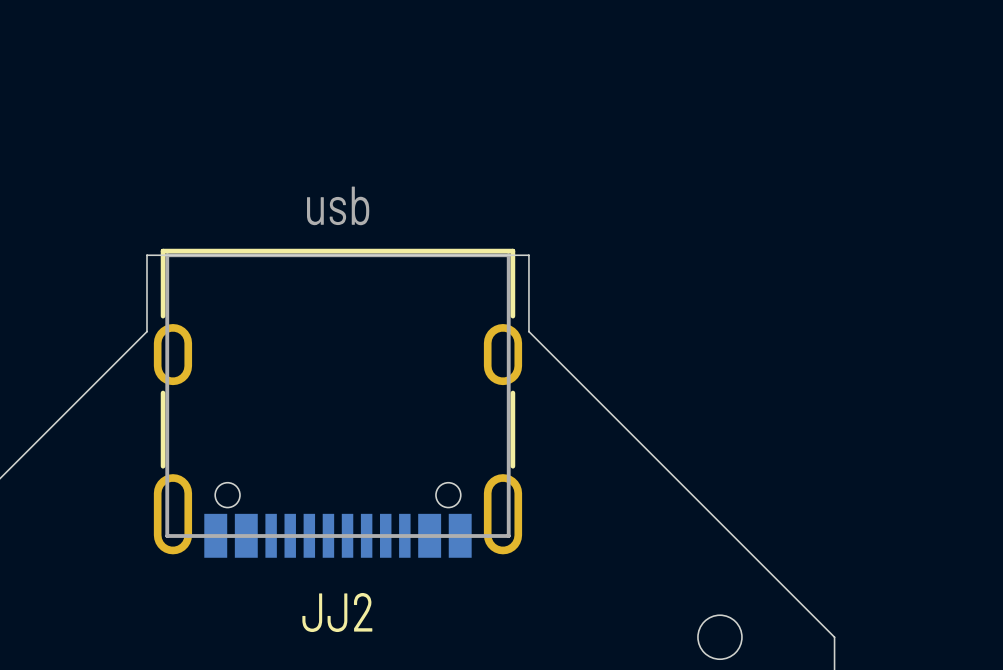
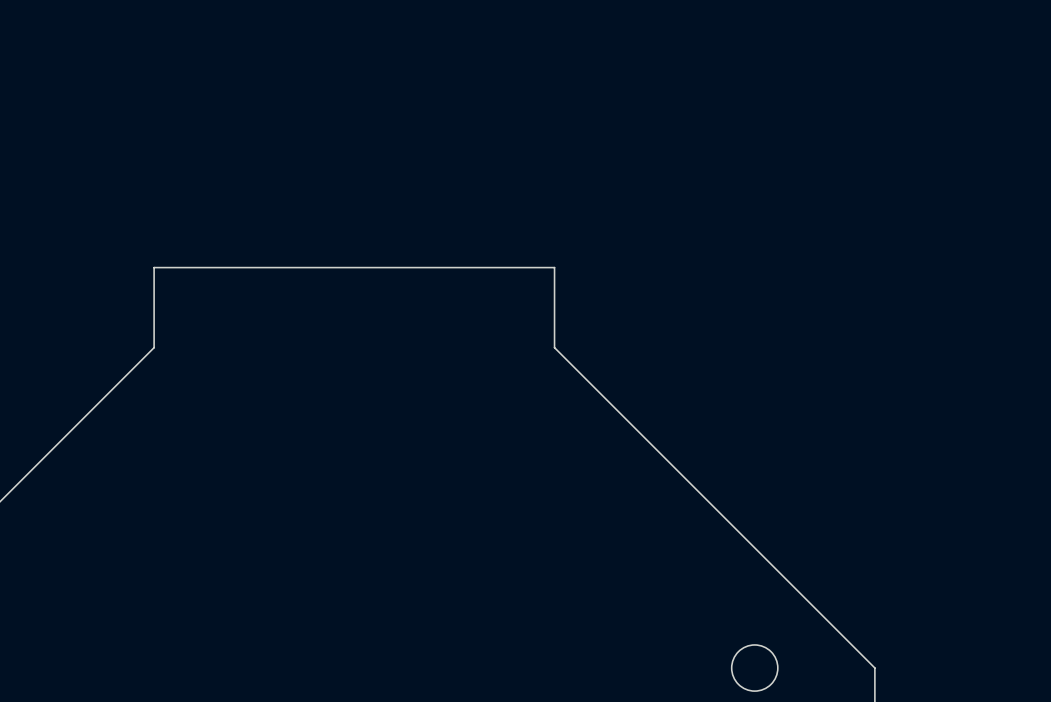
JJ2: usb (337, 403) -> none

